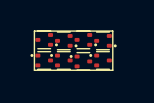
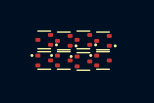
line: (34, 31) (112, 31) (112, 70) (34, 70) (34, 31) -> none

